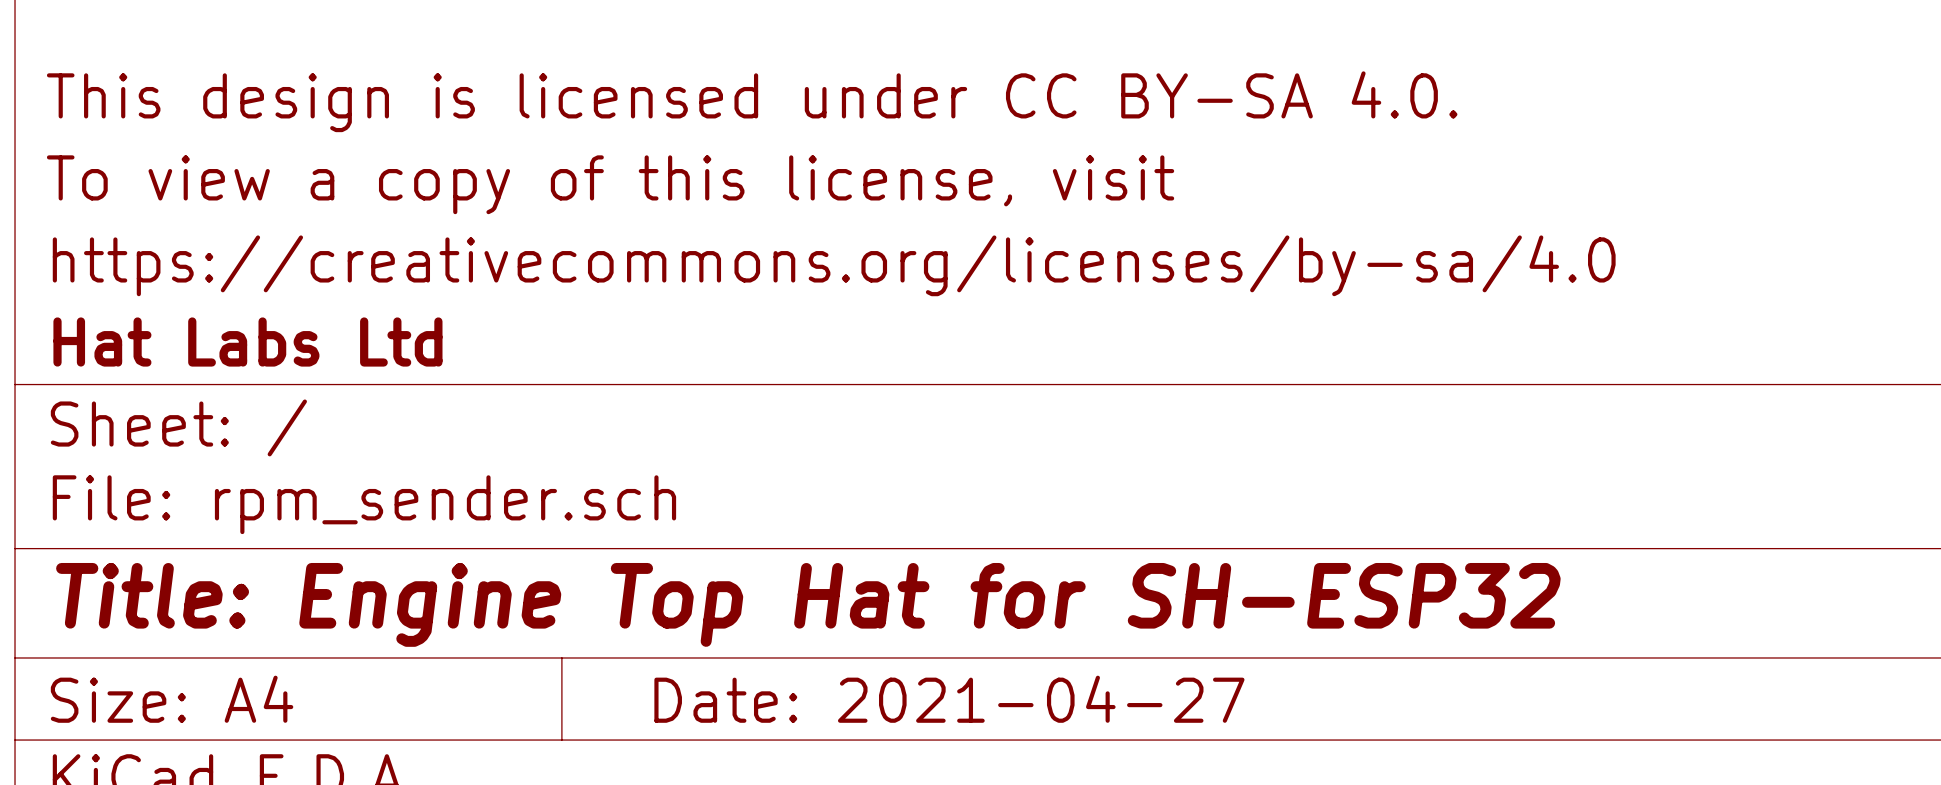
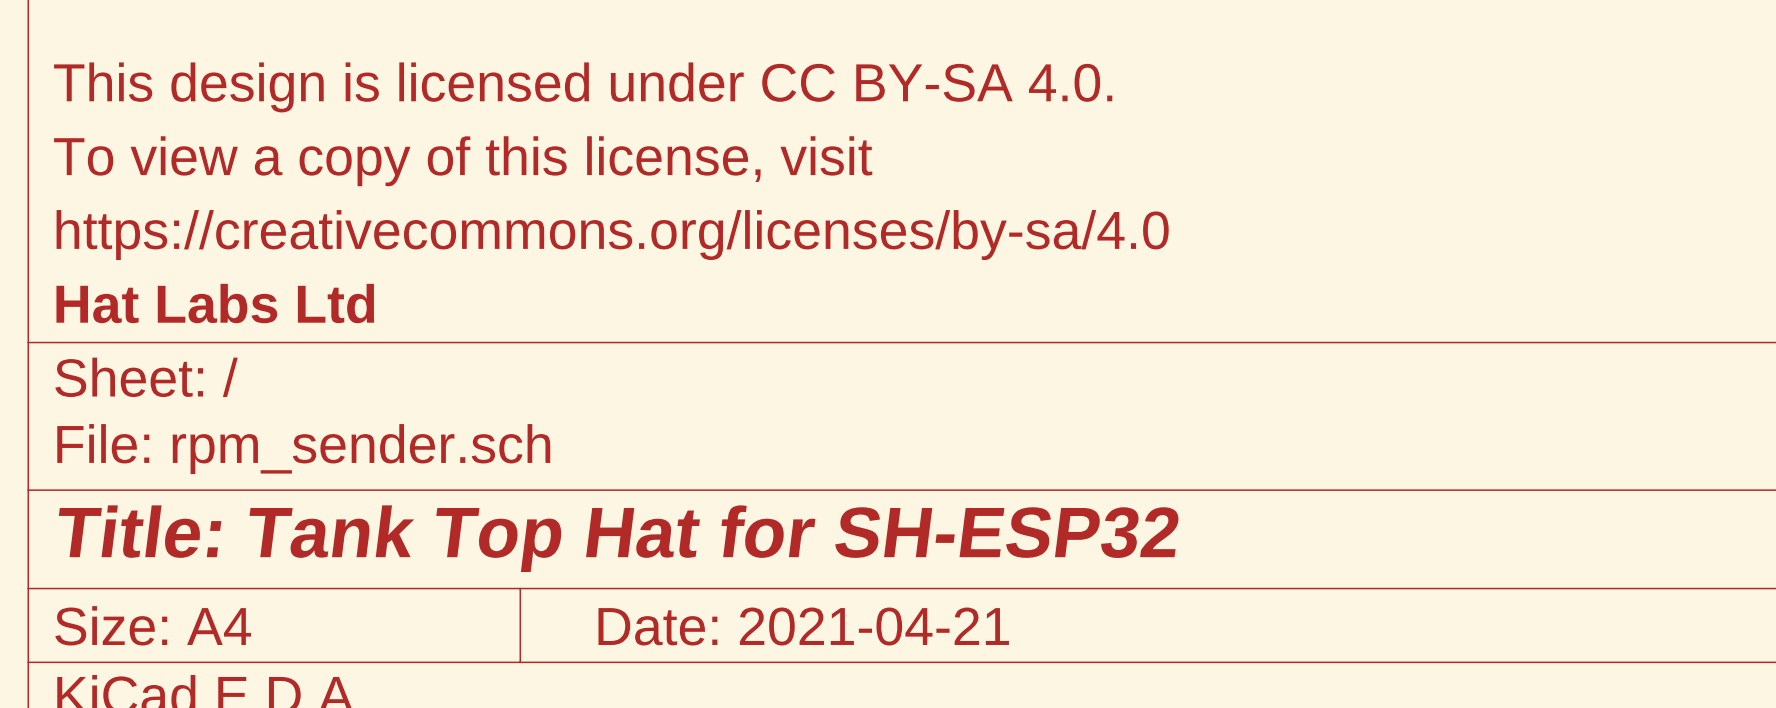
title block: Title: Engine Top Hat for SH-ESP32 (808, 604) -> Title: Tank Top Hat for SH-ESP32 (618, 538)
title block: Date: 2021-04-27 (949, 699) -> Date: 2021-04-21 (803, 626)

